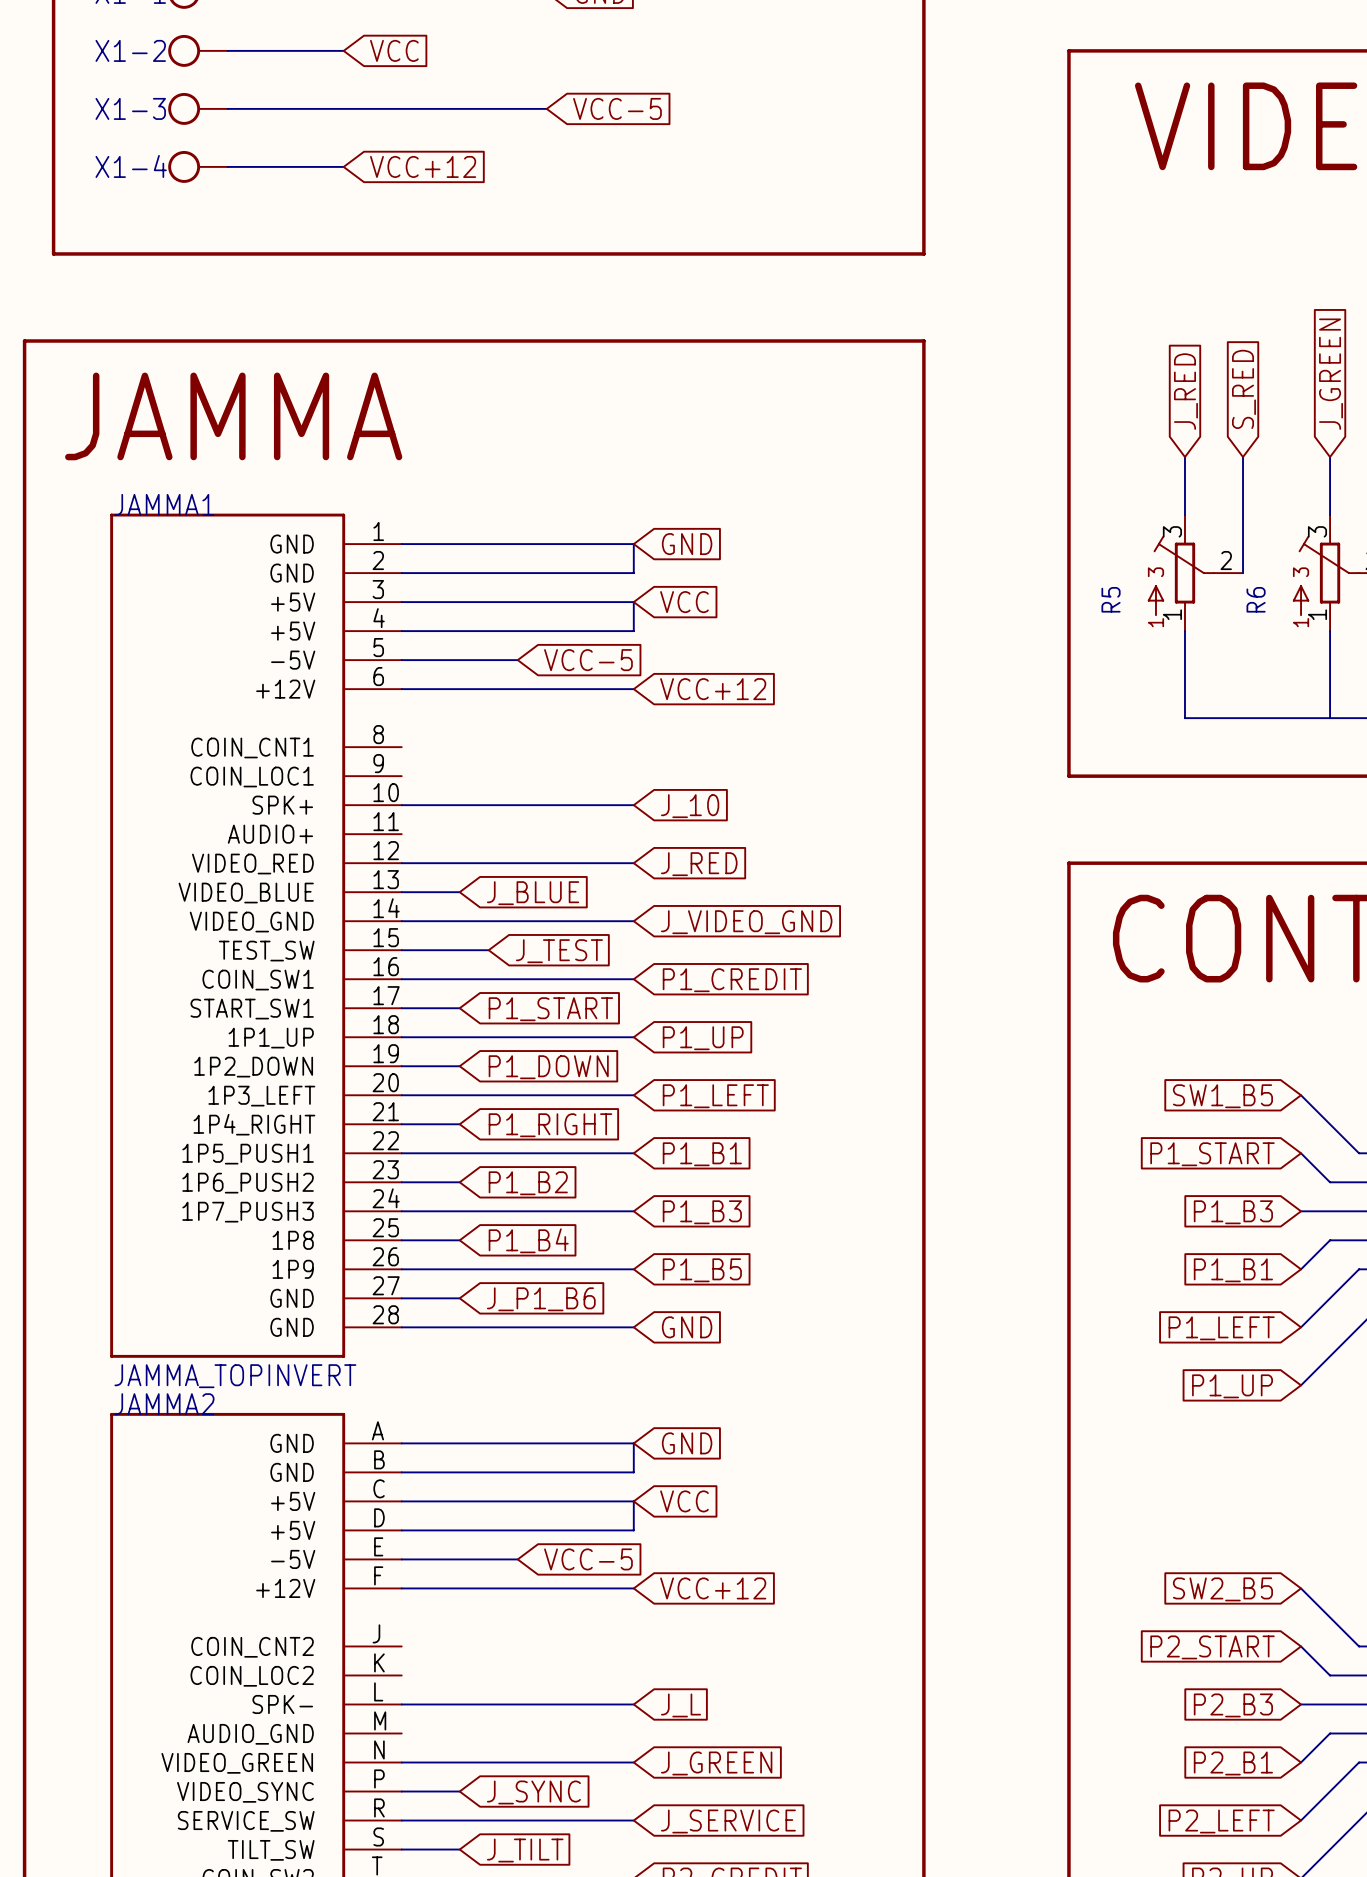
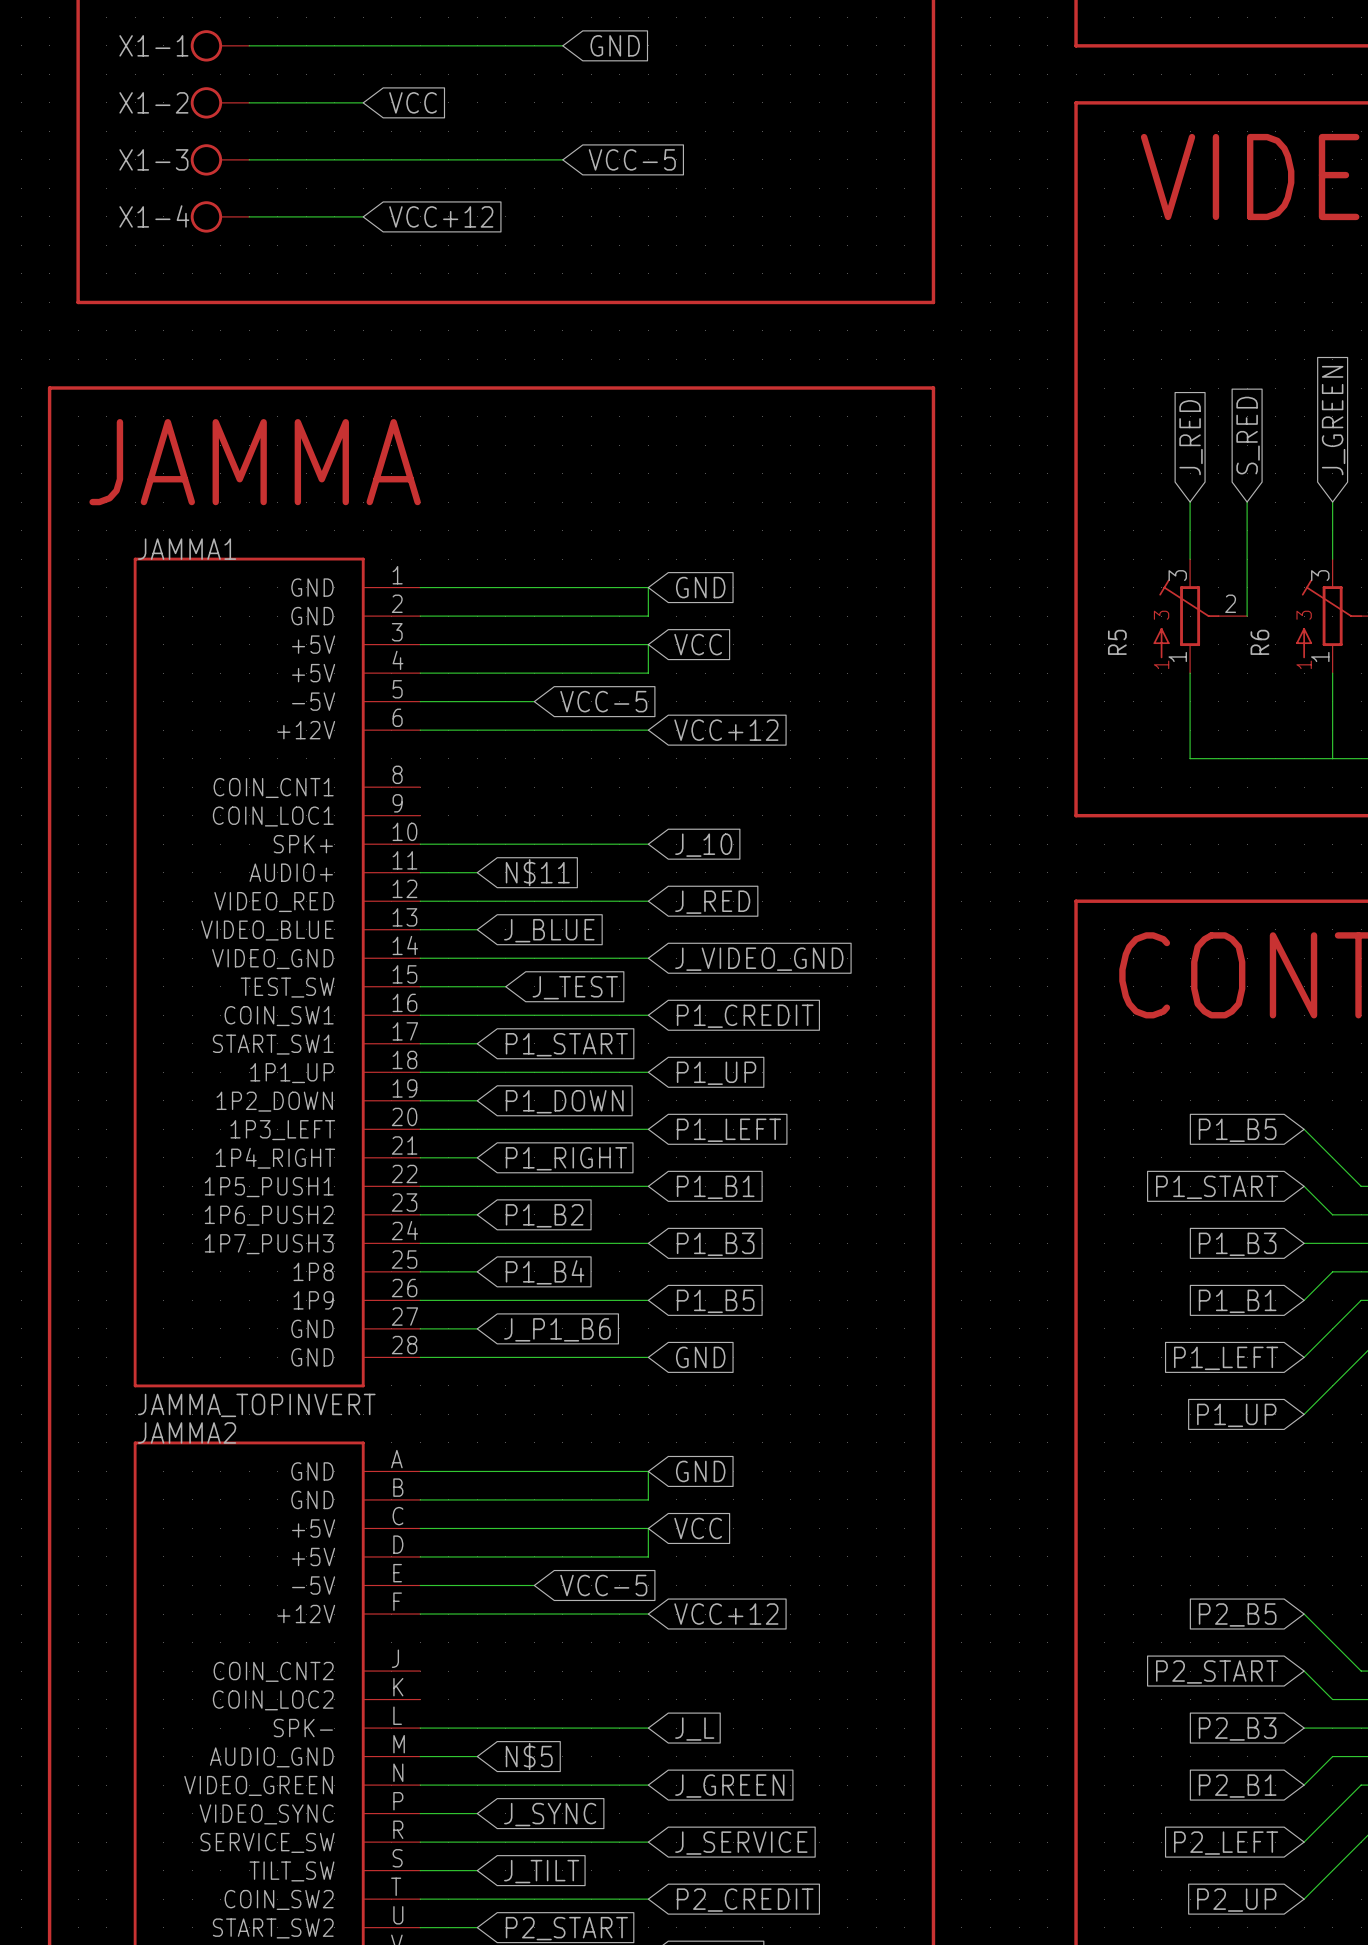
wire: none -> (420, 872) (477, 872)
global label: none -> N$11 (537, 872)
global label: SW1_B5 (1222, 1096) -> P1_B5 (1237, 1130)
global label: SW2_B5 (1222, 1589) -> P2_B5 (1237, 1614)
wire: none -> (420, 1756) (477, 1756)
global label: none -> N$5 (529, 1756)

